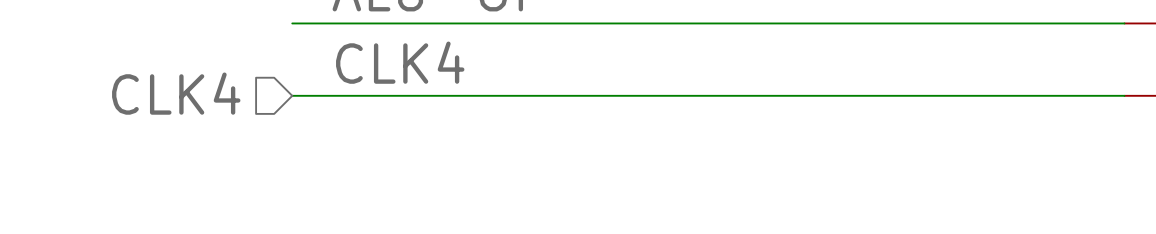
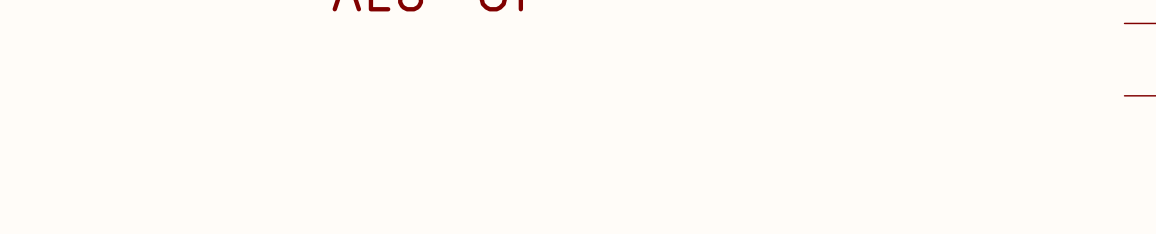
wire: (292, 23) (1124, 23) -> none
label: CLK4 (400, 62) -> none
hierarchical label: CLK4 (176, 93) -> none
wire: (292, 95) (1124, 95) -> none

